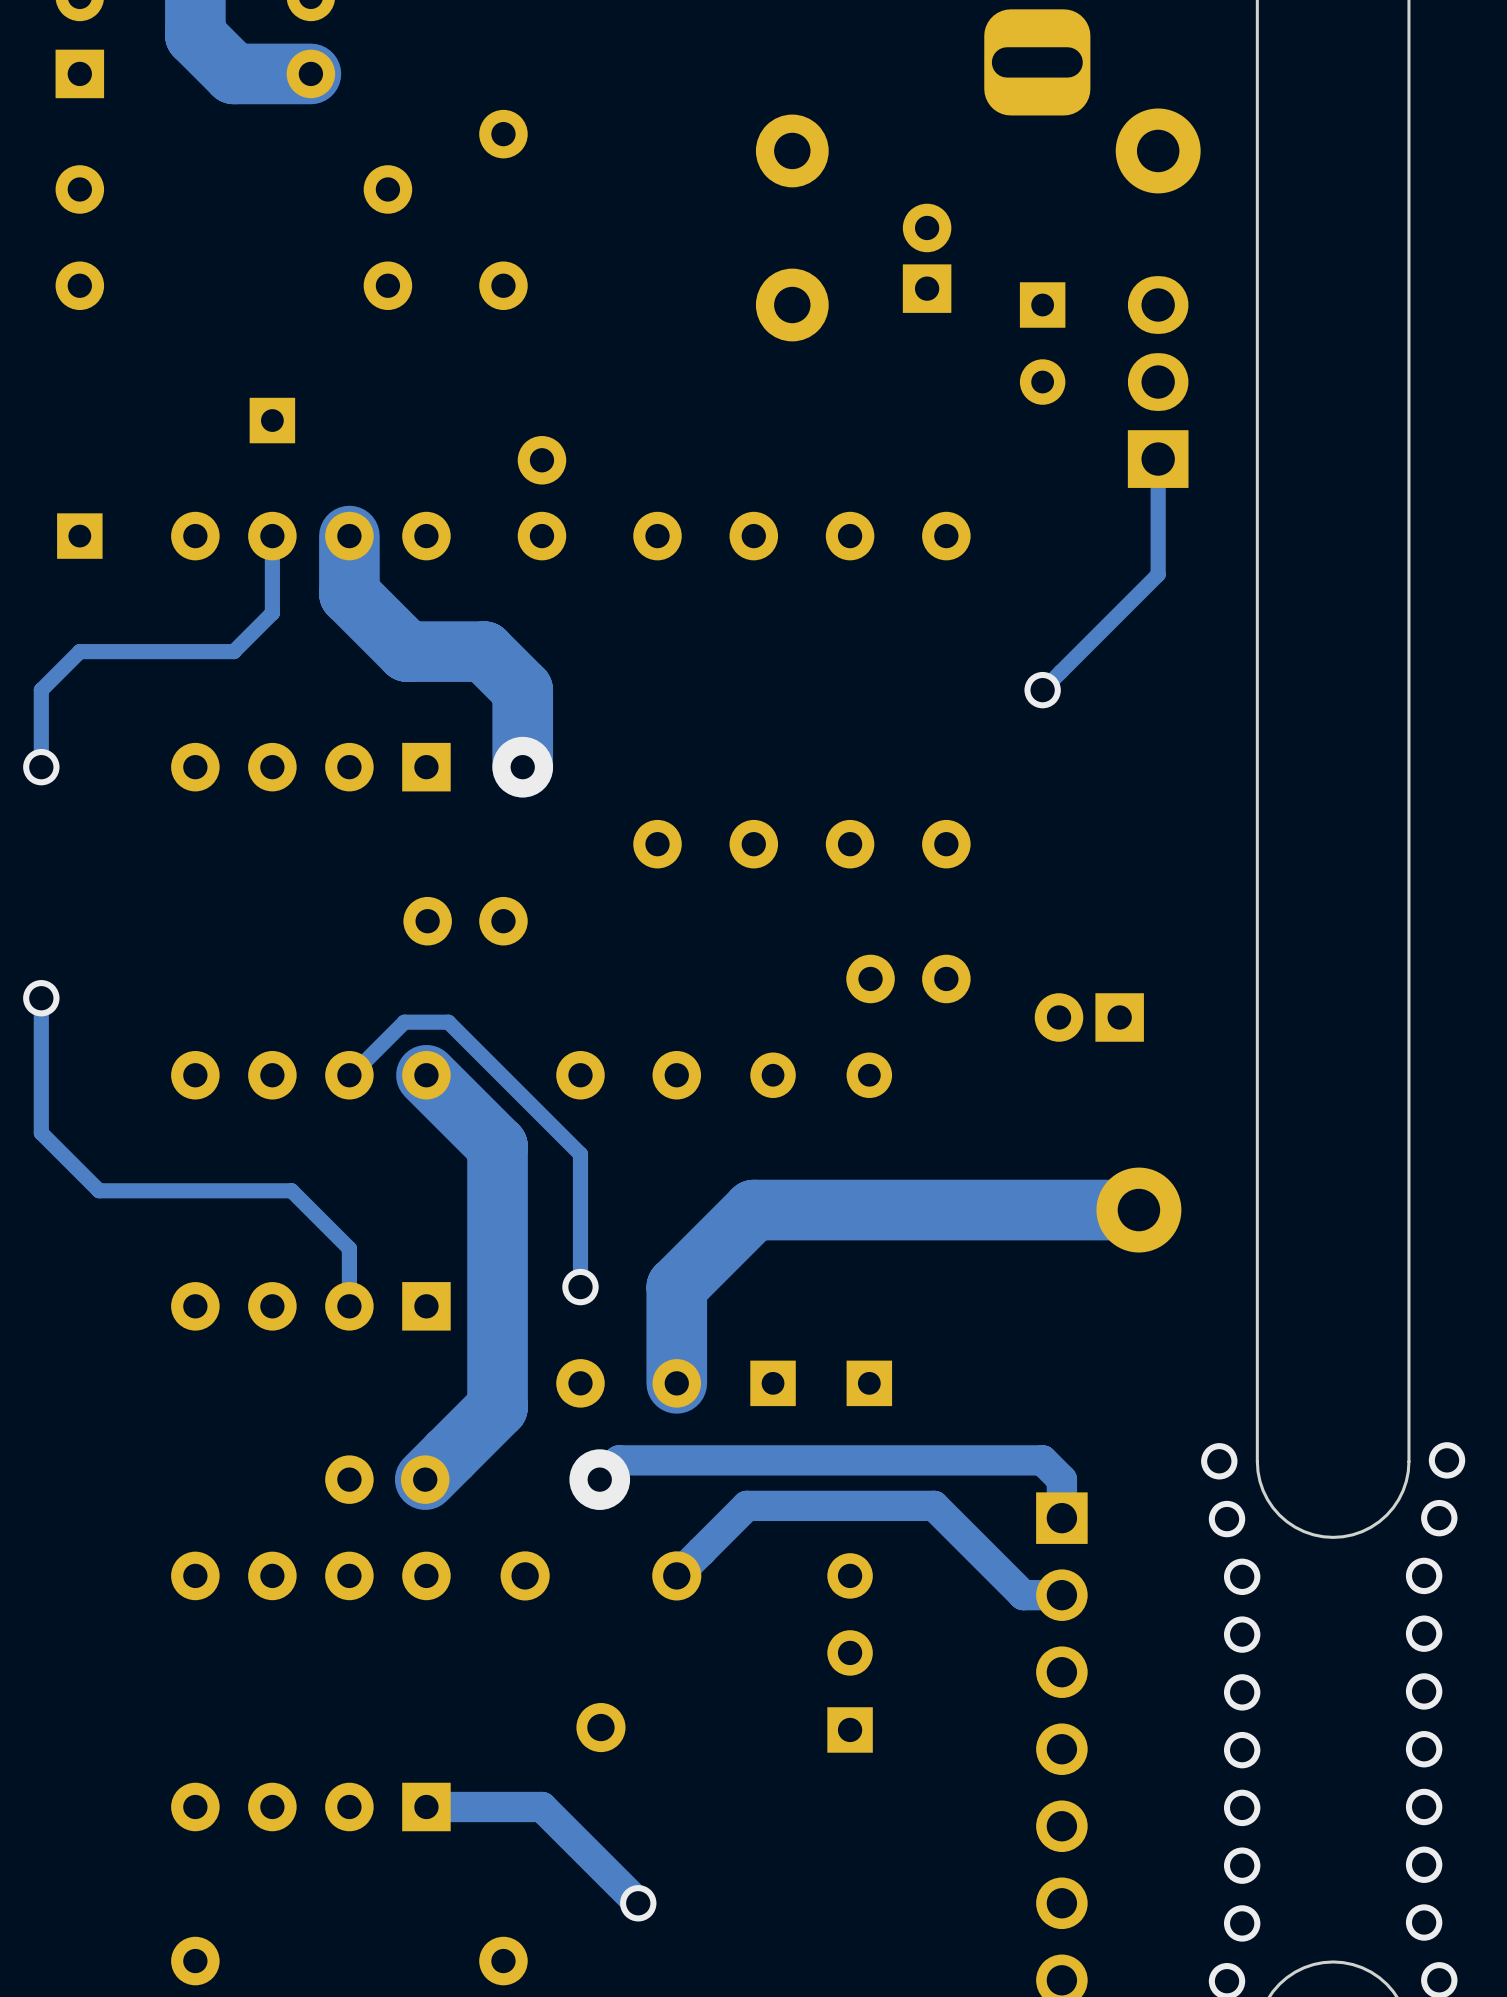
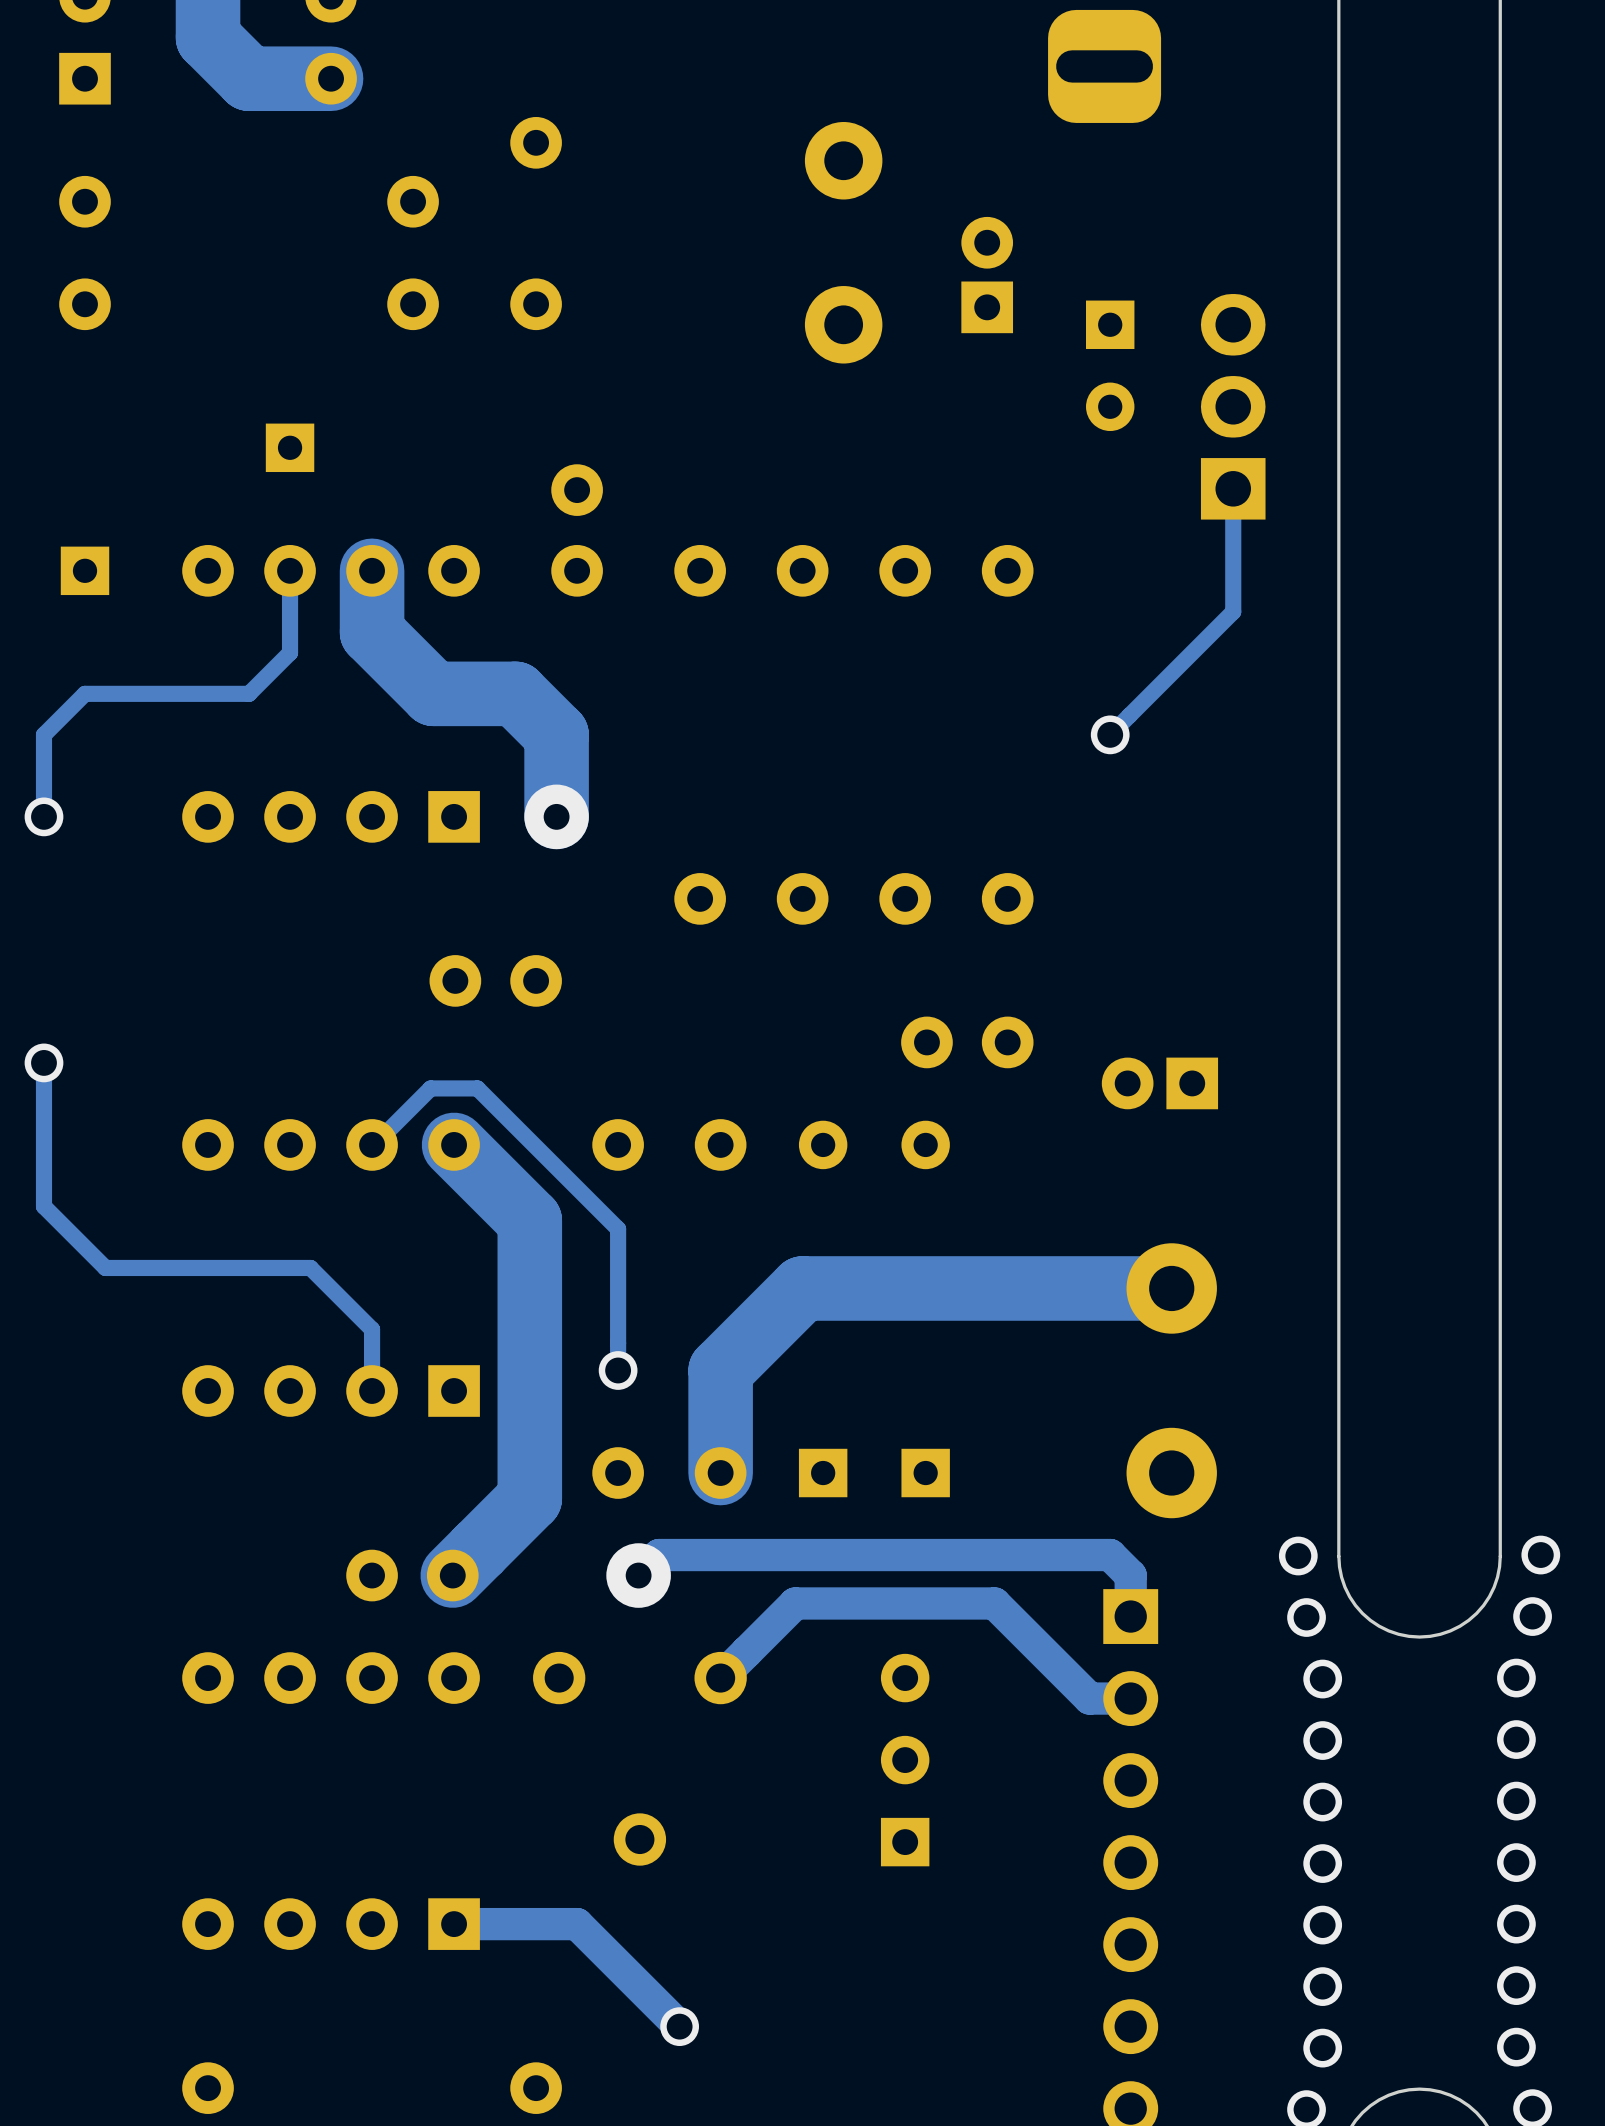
part: (1158, 150) -> none
part position: (1138, 1210) -> (1171, 1288)
part: none -> (1171, 1473)

